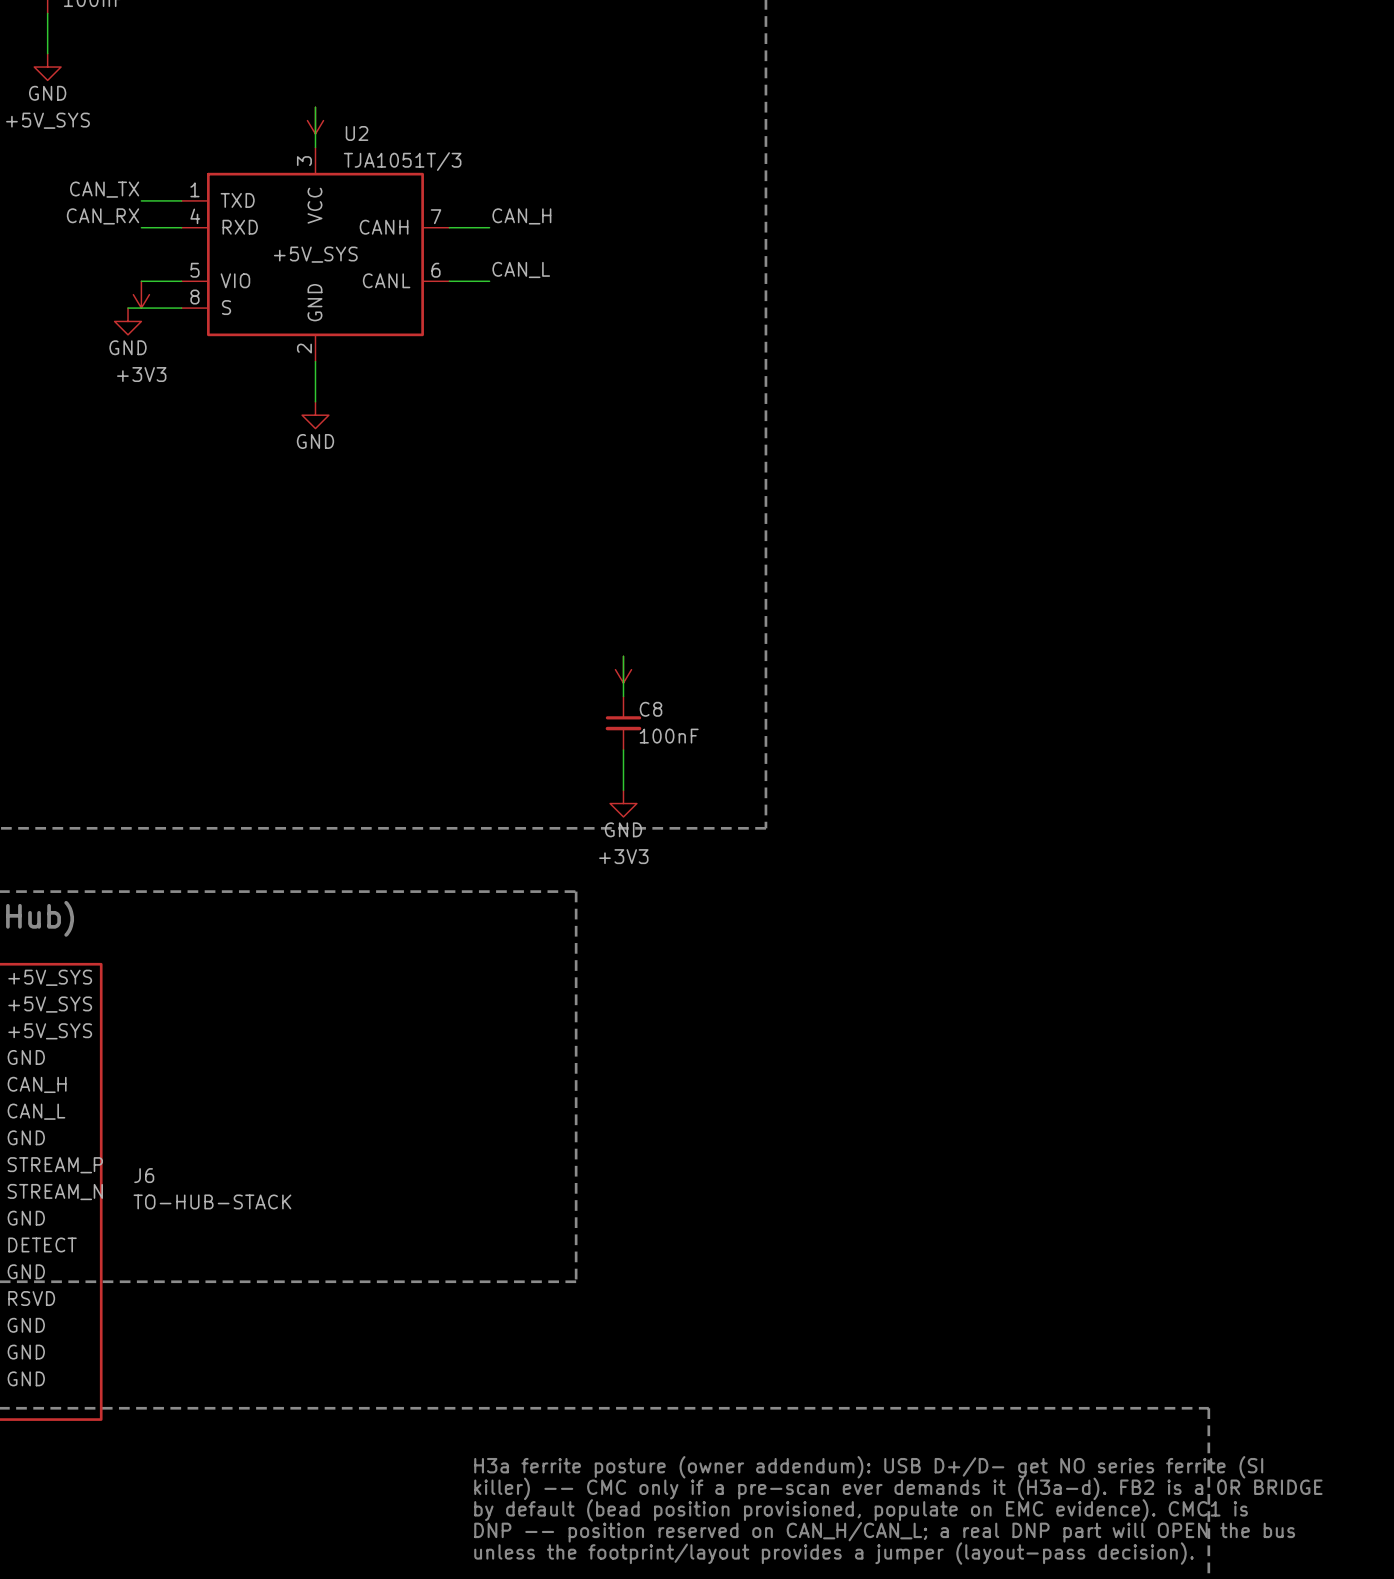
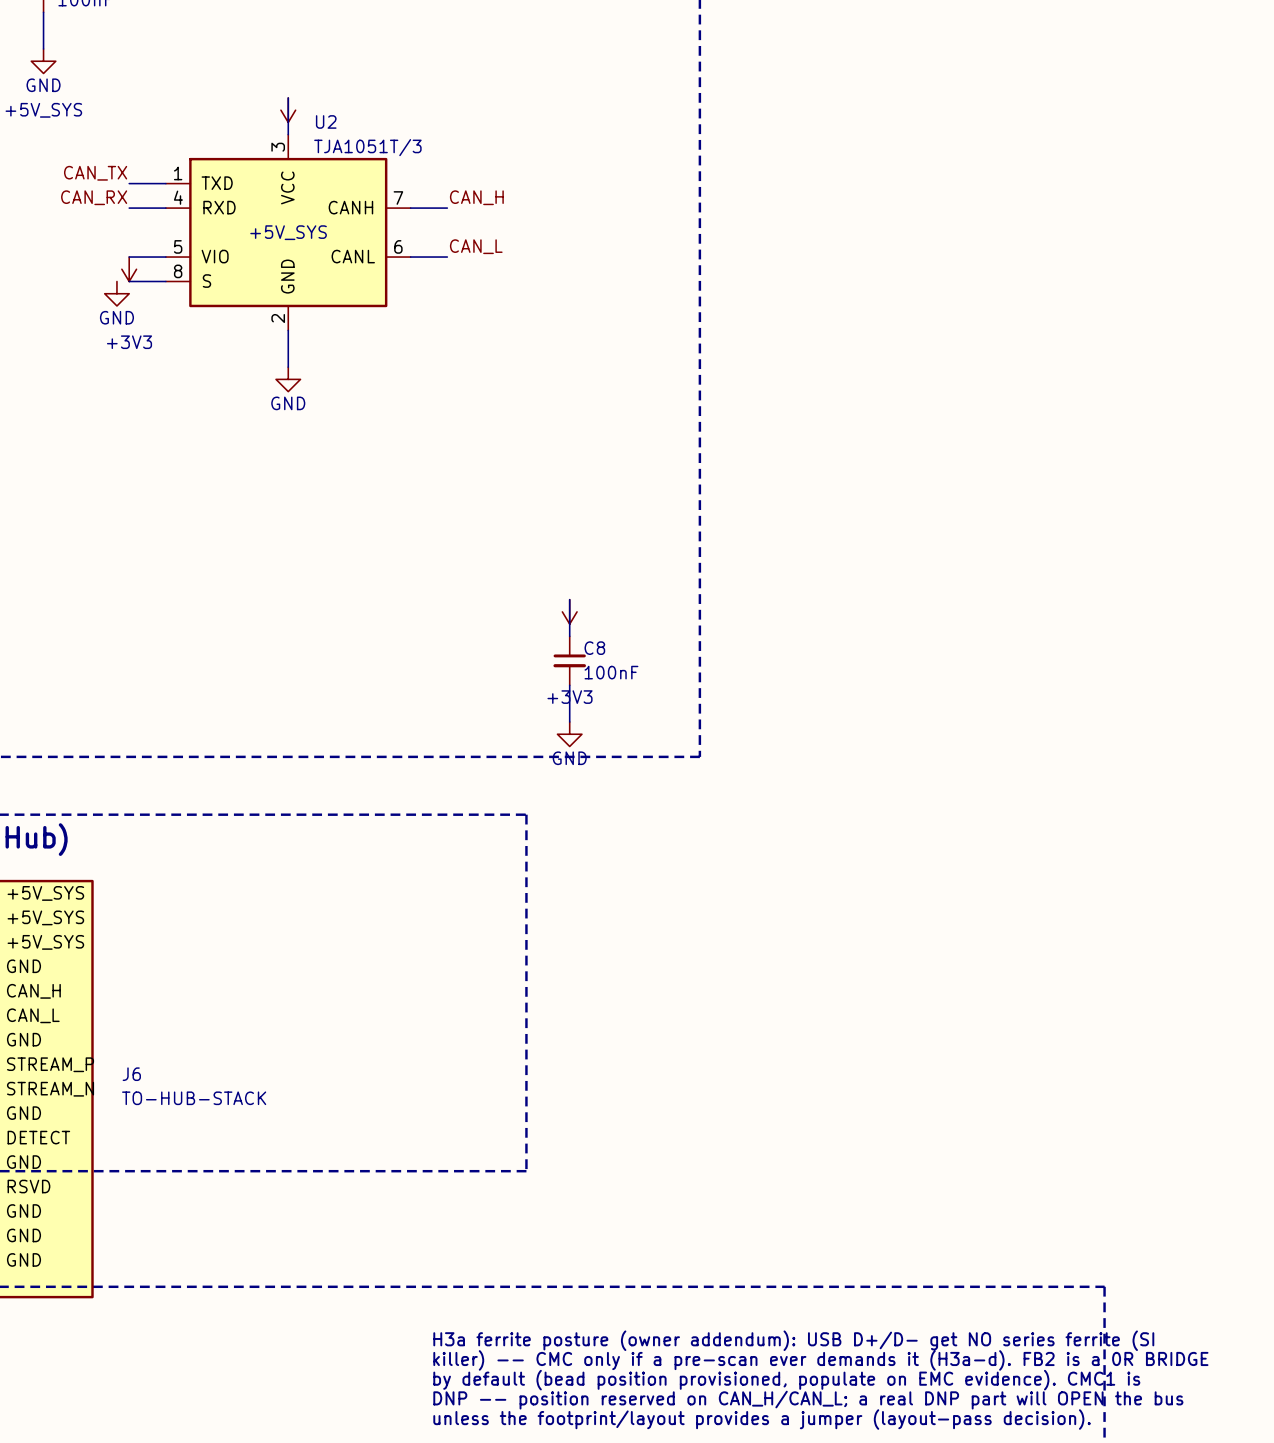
wire: (128, 308) (141, 308) -> none
power symbol text position: +3V3 (623, 856) -> +3V3 (570, 697)

